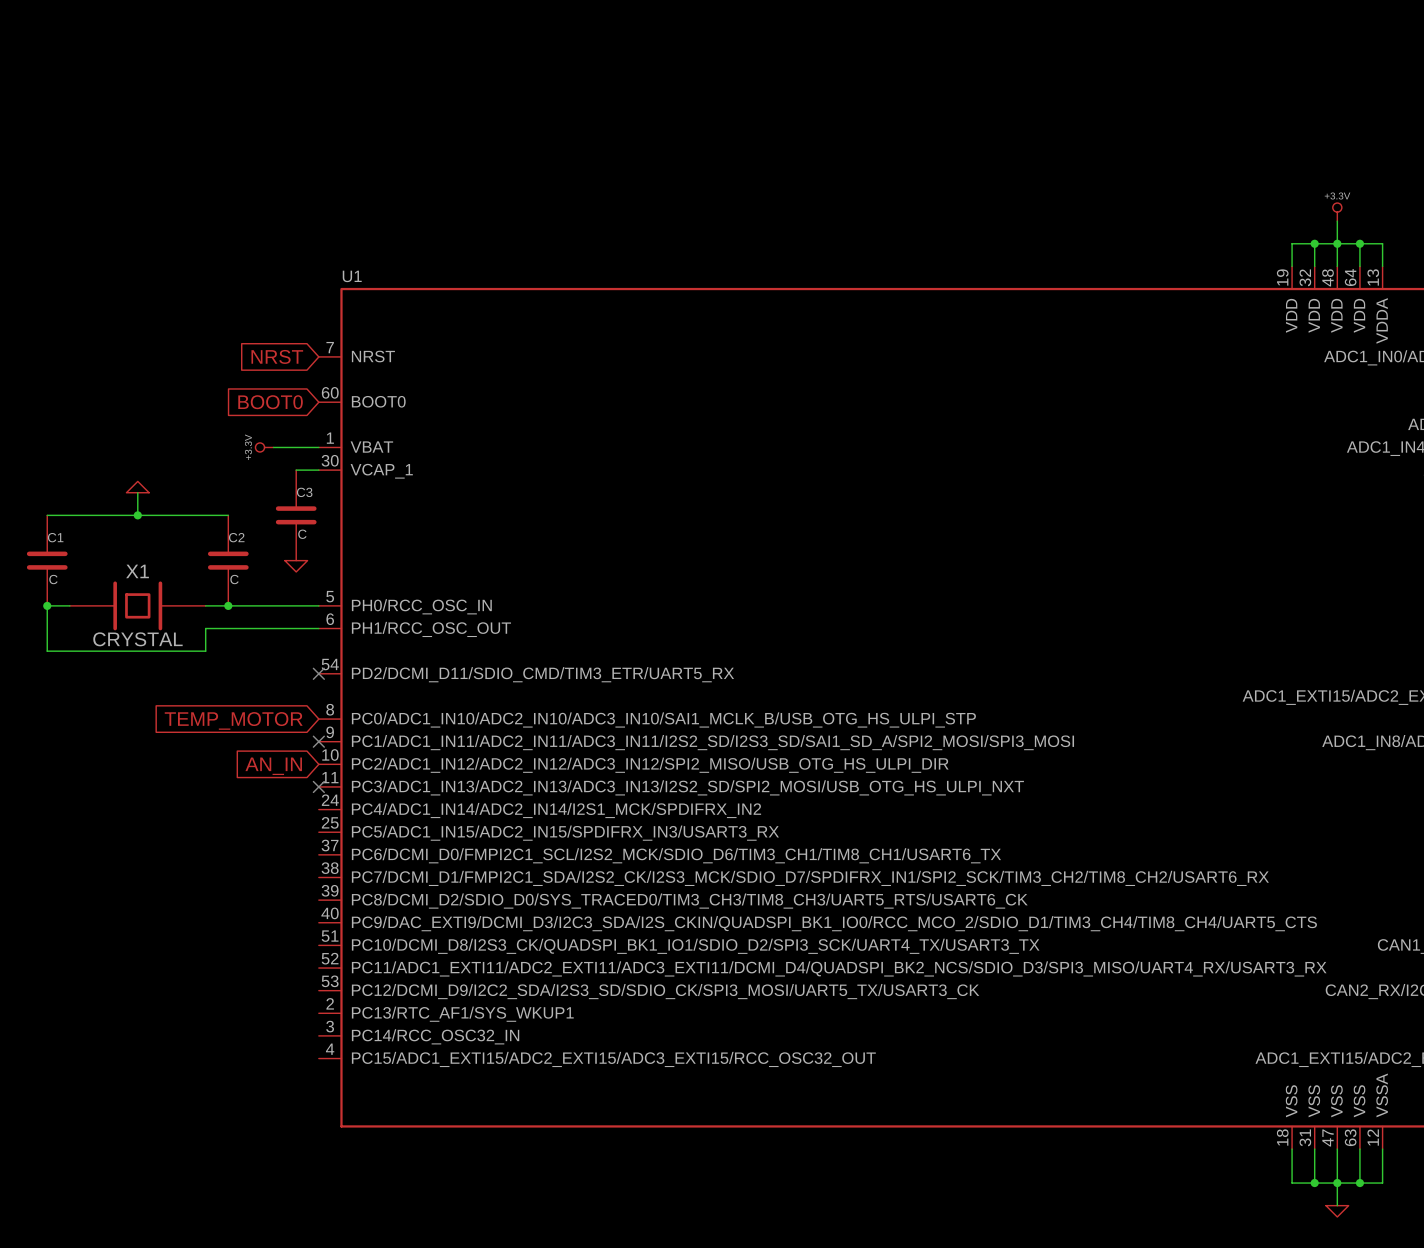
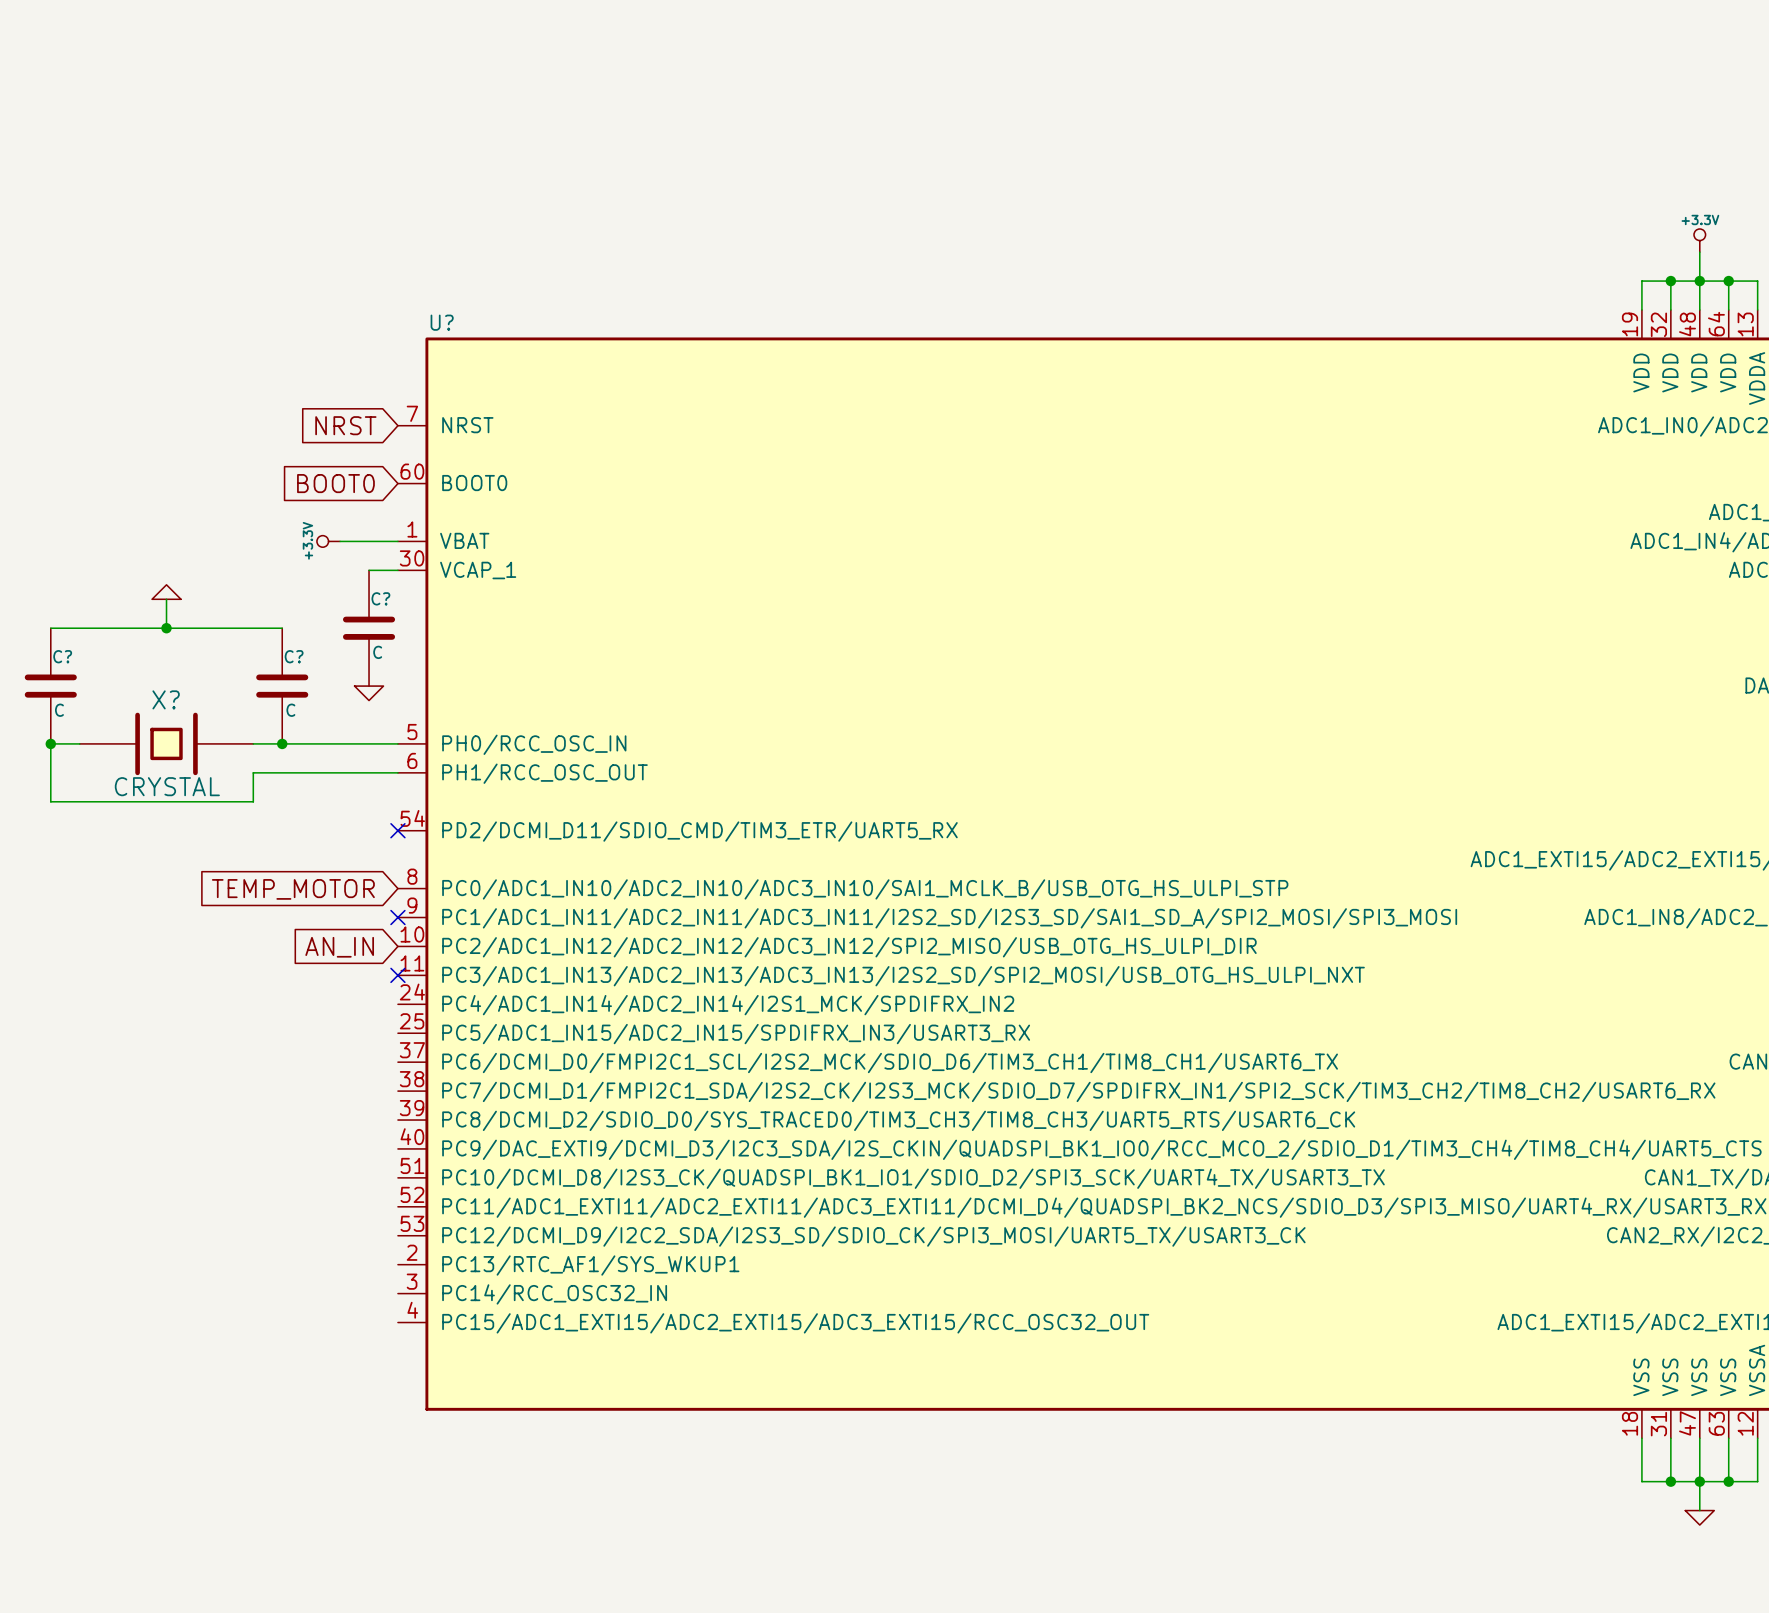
U1 name: U1 (352, 276) -> U? (442, 322)
C3 name: C3 (304, 492) -> C? (380, 598)
C1 name: C1 (55, 537) -> C? (62, 656)
C2 name: C2 (236, 537) -> C? (294, 656)
X1 name: X1 (137, 571) -> X? (166, 699)

